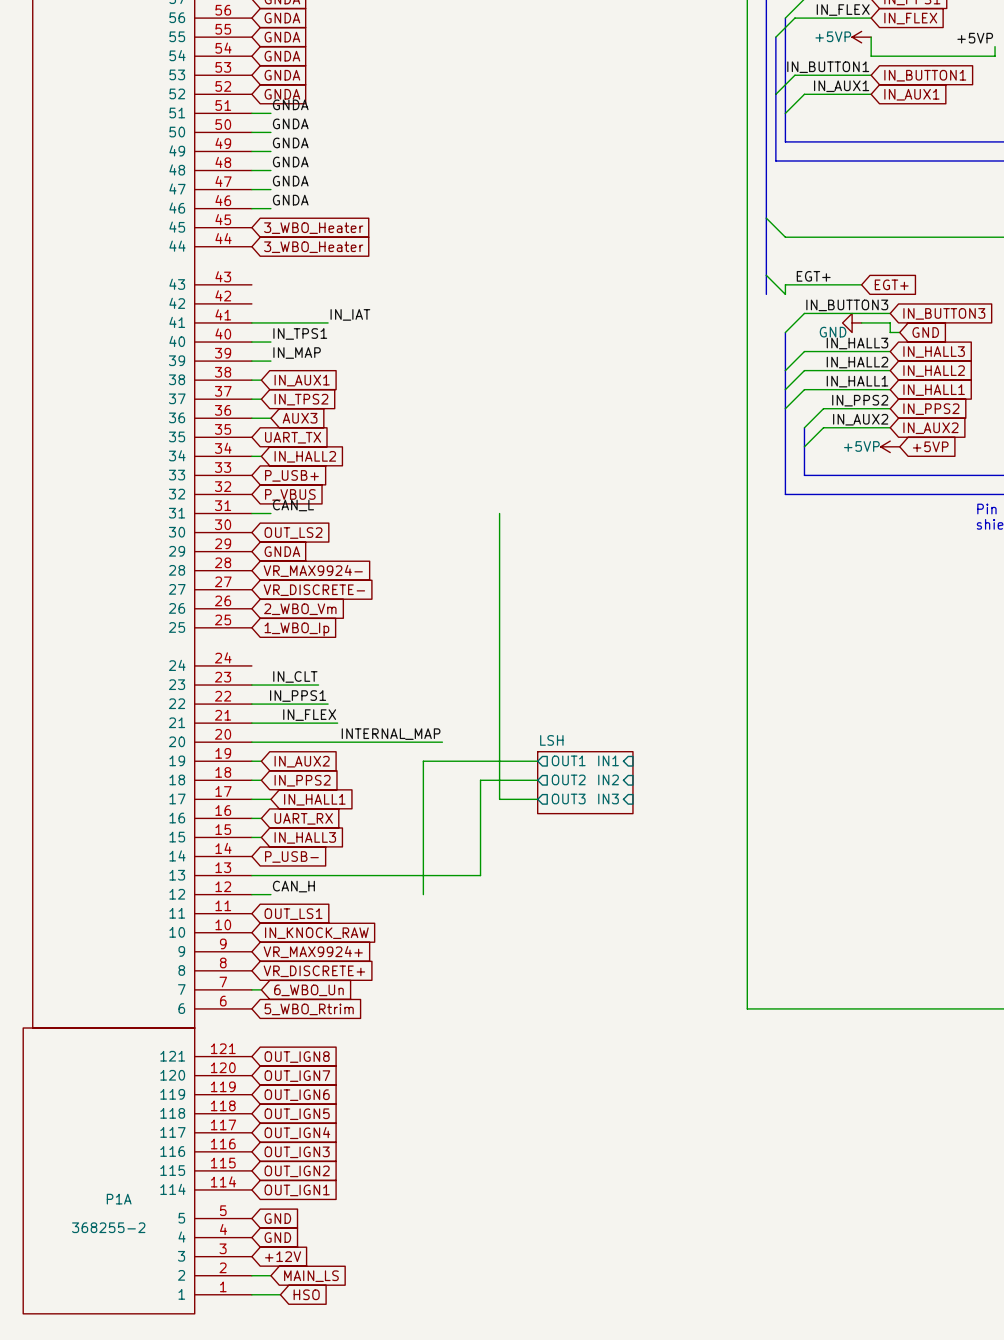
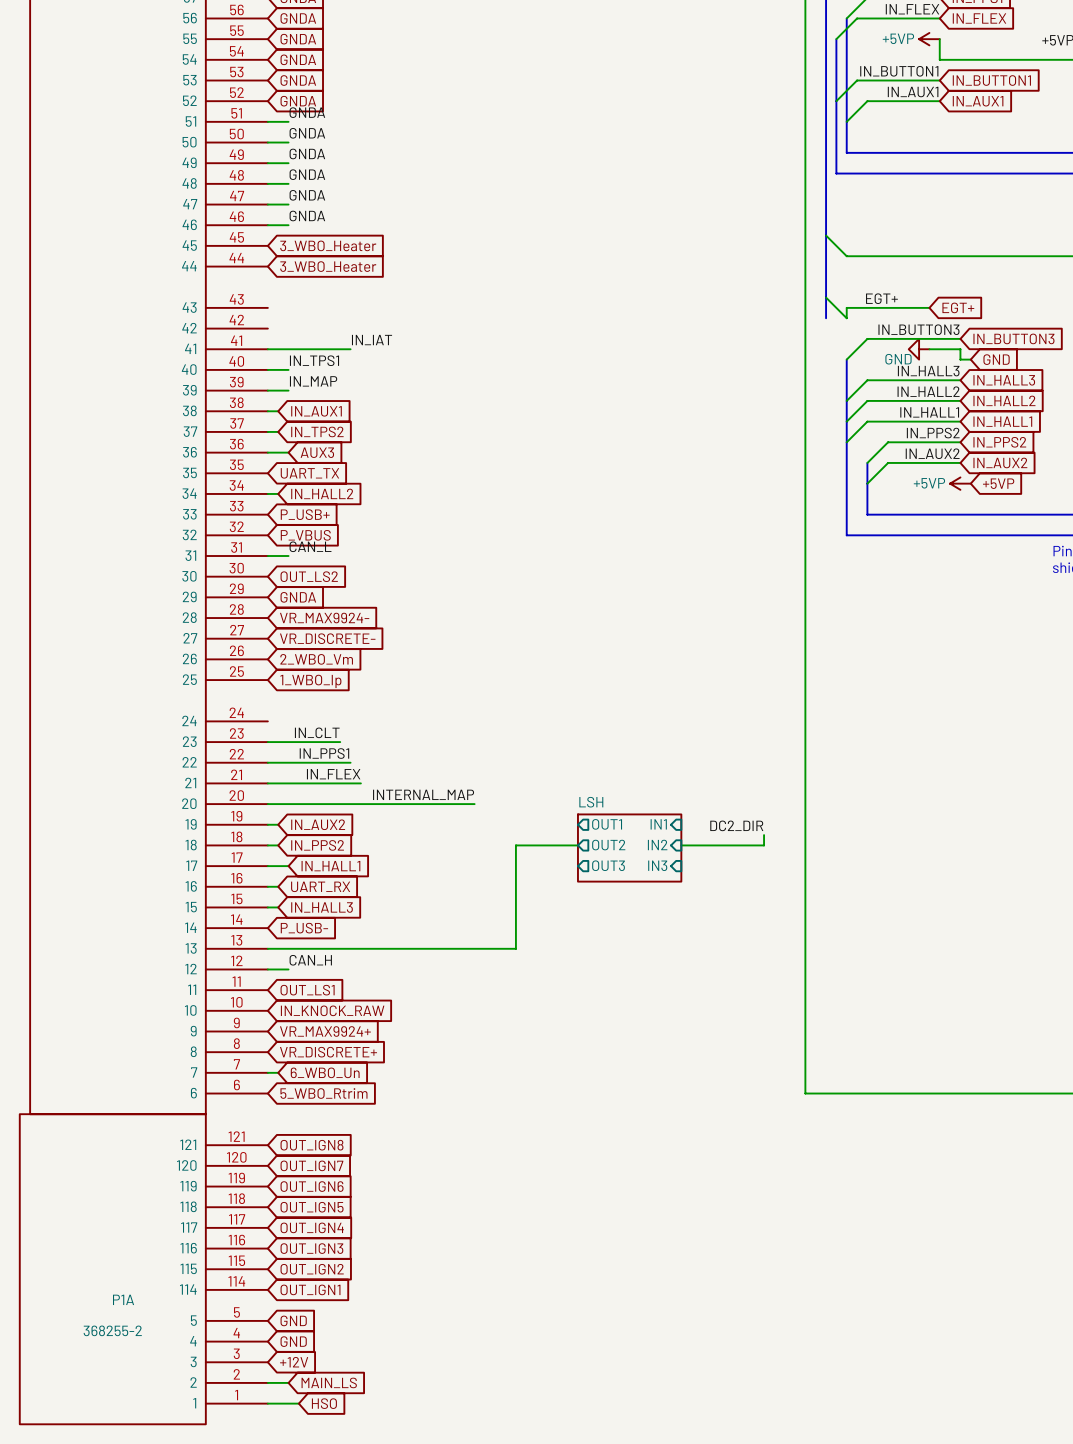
wire: (499, 513) (499, 799) (537, 799) -> none
wire: (537, 761) (423, 761) (423, 894) -> none
label: none -> DC2_DIR (736, 825)
wire: none -> (764, 835) (764, 845) (681, 845)

